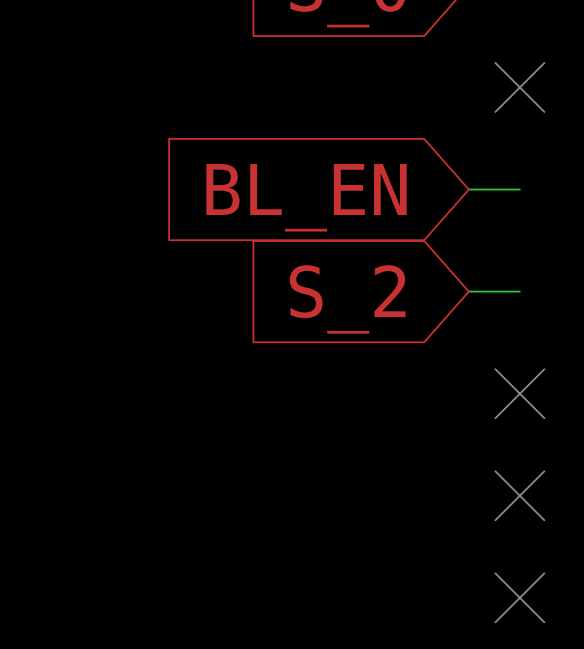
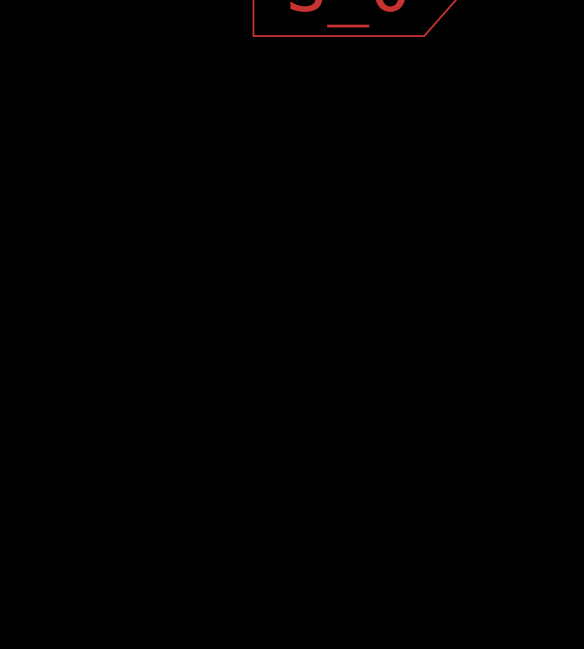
no-connect mark: (519, 87) -> none
wire: (468, 189) (519, 189) -> none
global label: BL_EN (306, 197) -> none
wire: (468, 291) (519, 291) -> none
global label: S_2 (347, 299) -> none
no-connect mark: (519, 393) -> none
no-connect mark: (519, 495) -> none
no-connect mark: (519, 597) -> none

